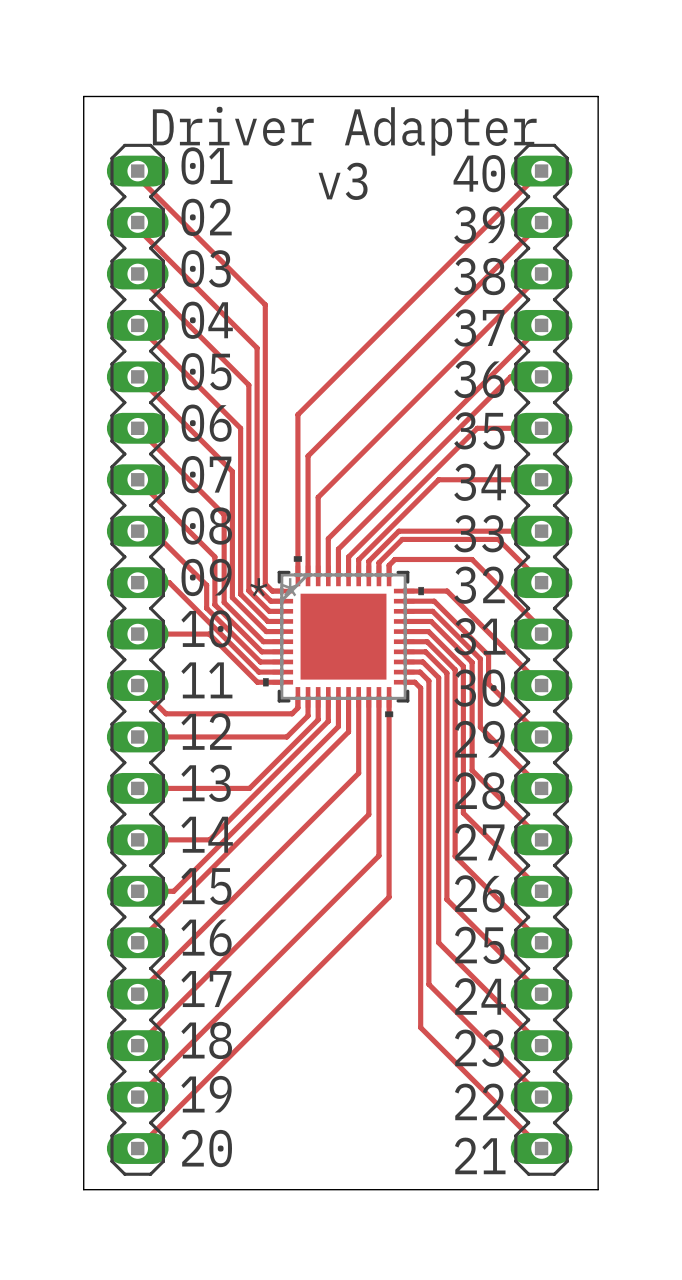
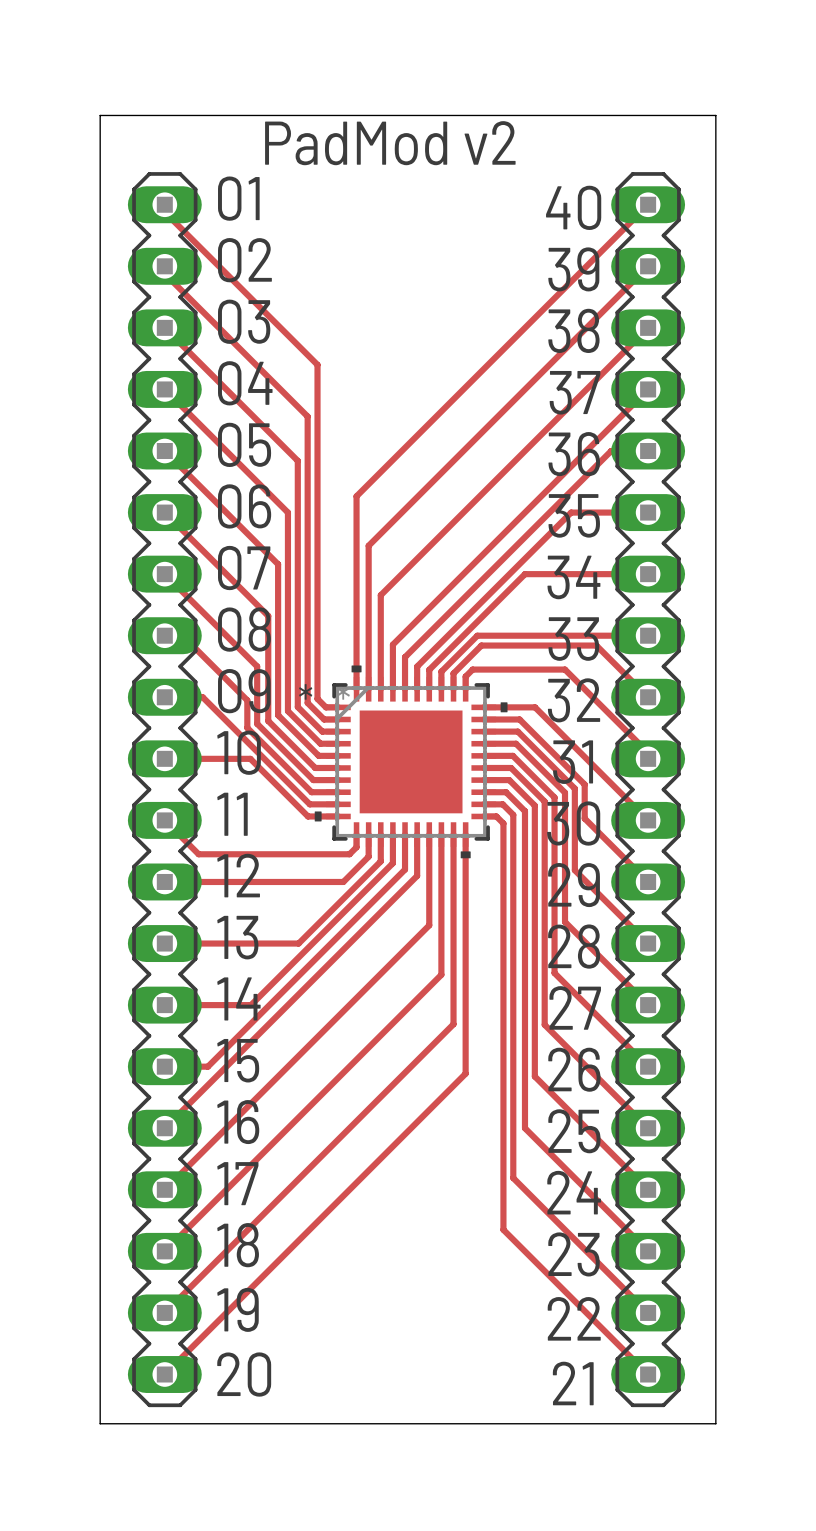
text: none -> PadMod v2 (390, 143)
text: Driver Adapter (344, 131) -> none
text: v3 (343, 181) -> none

